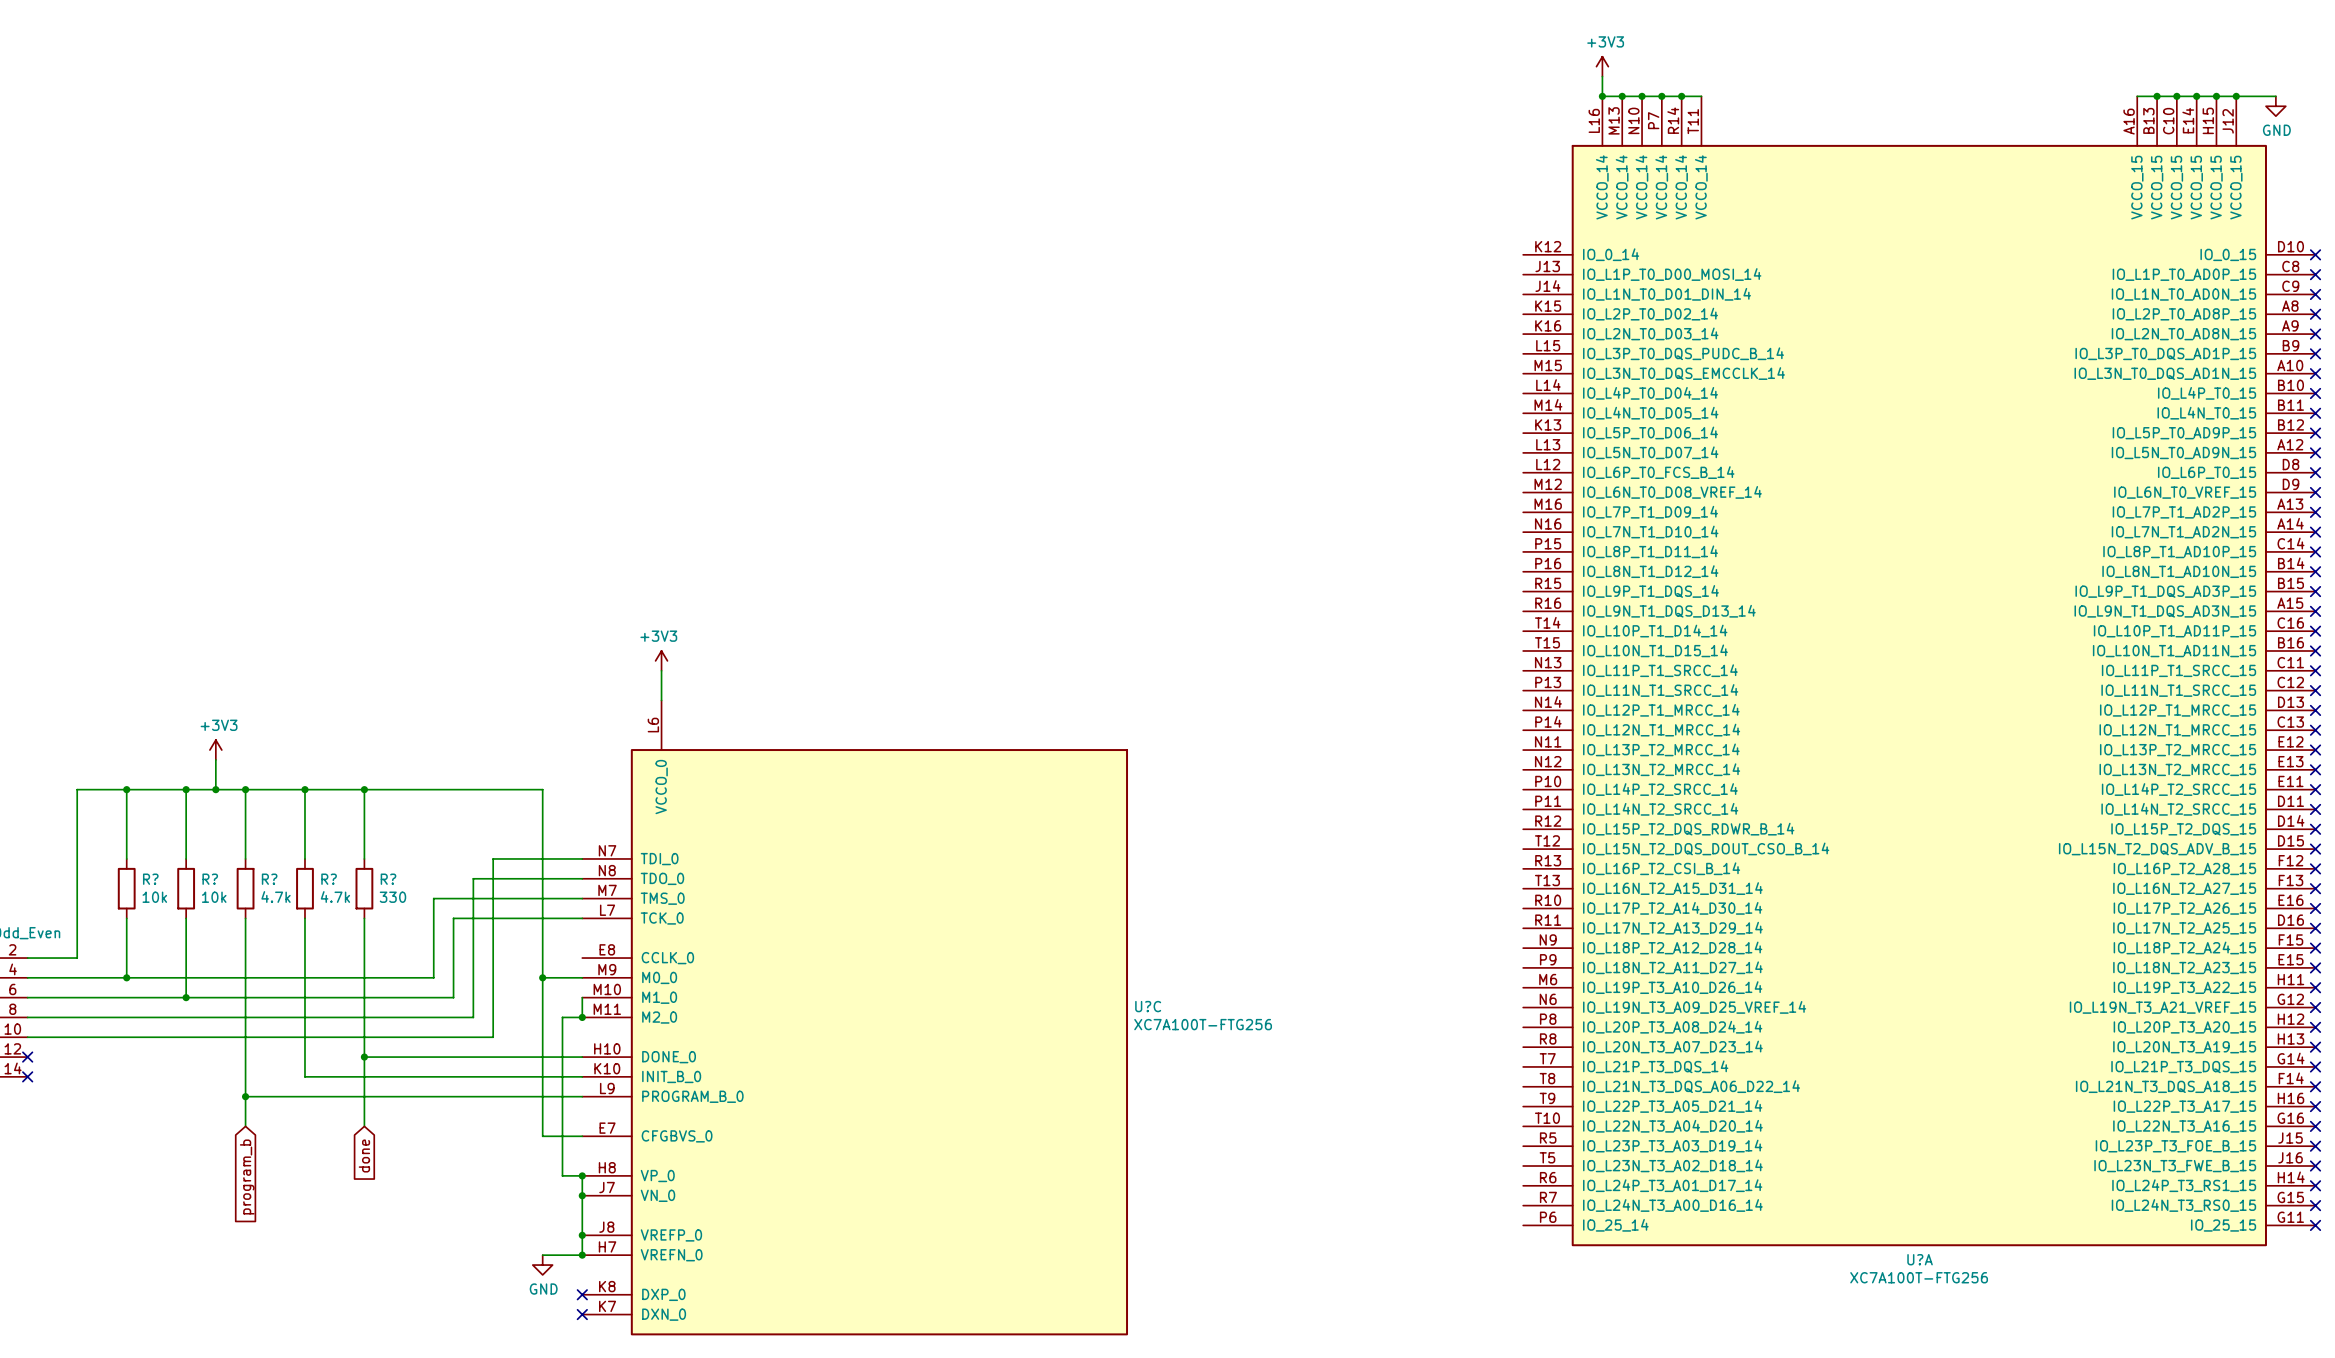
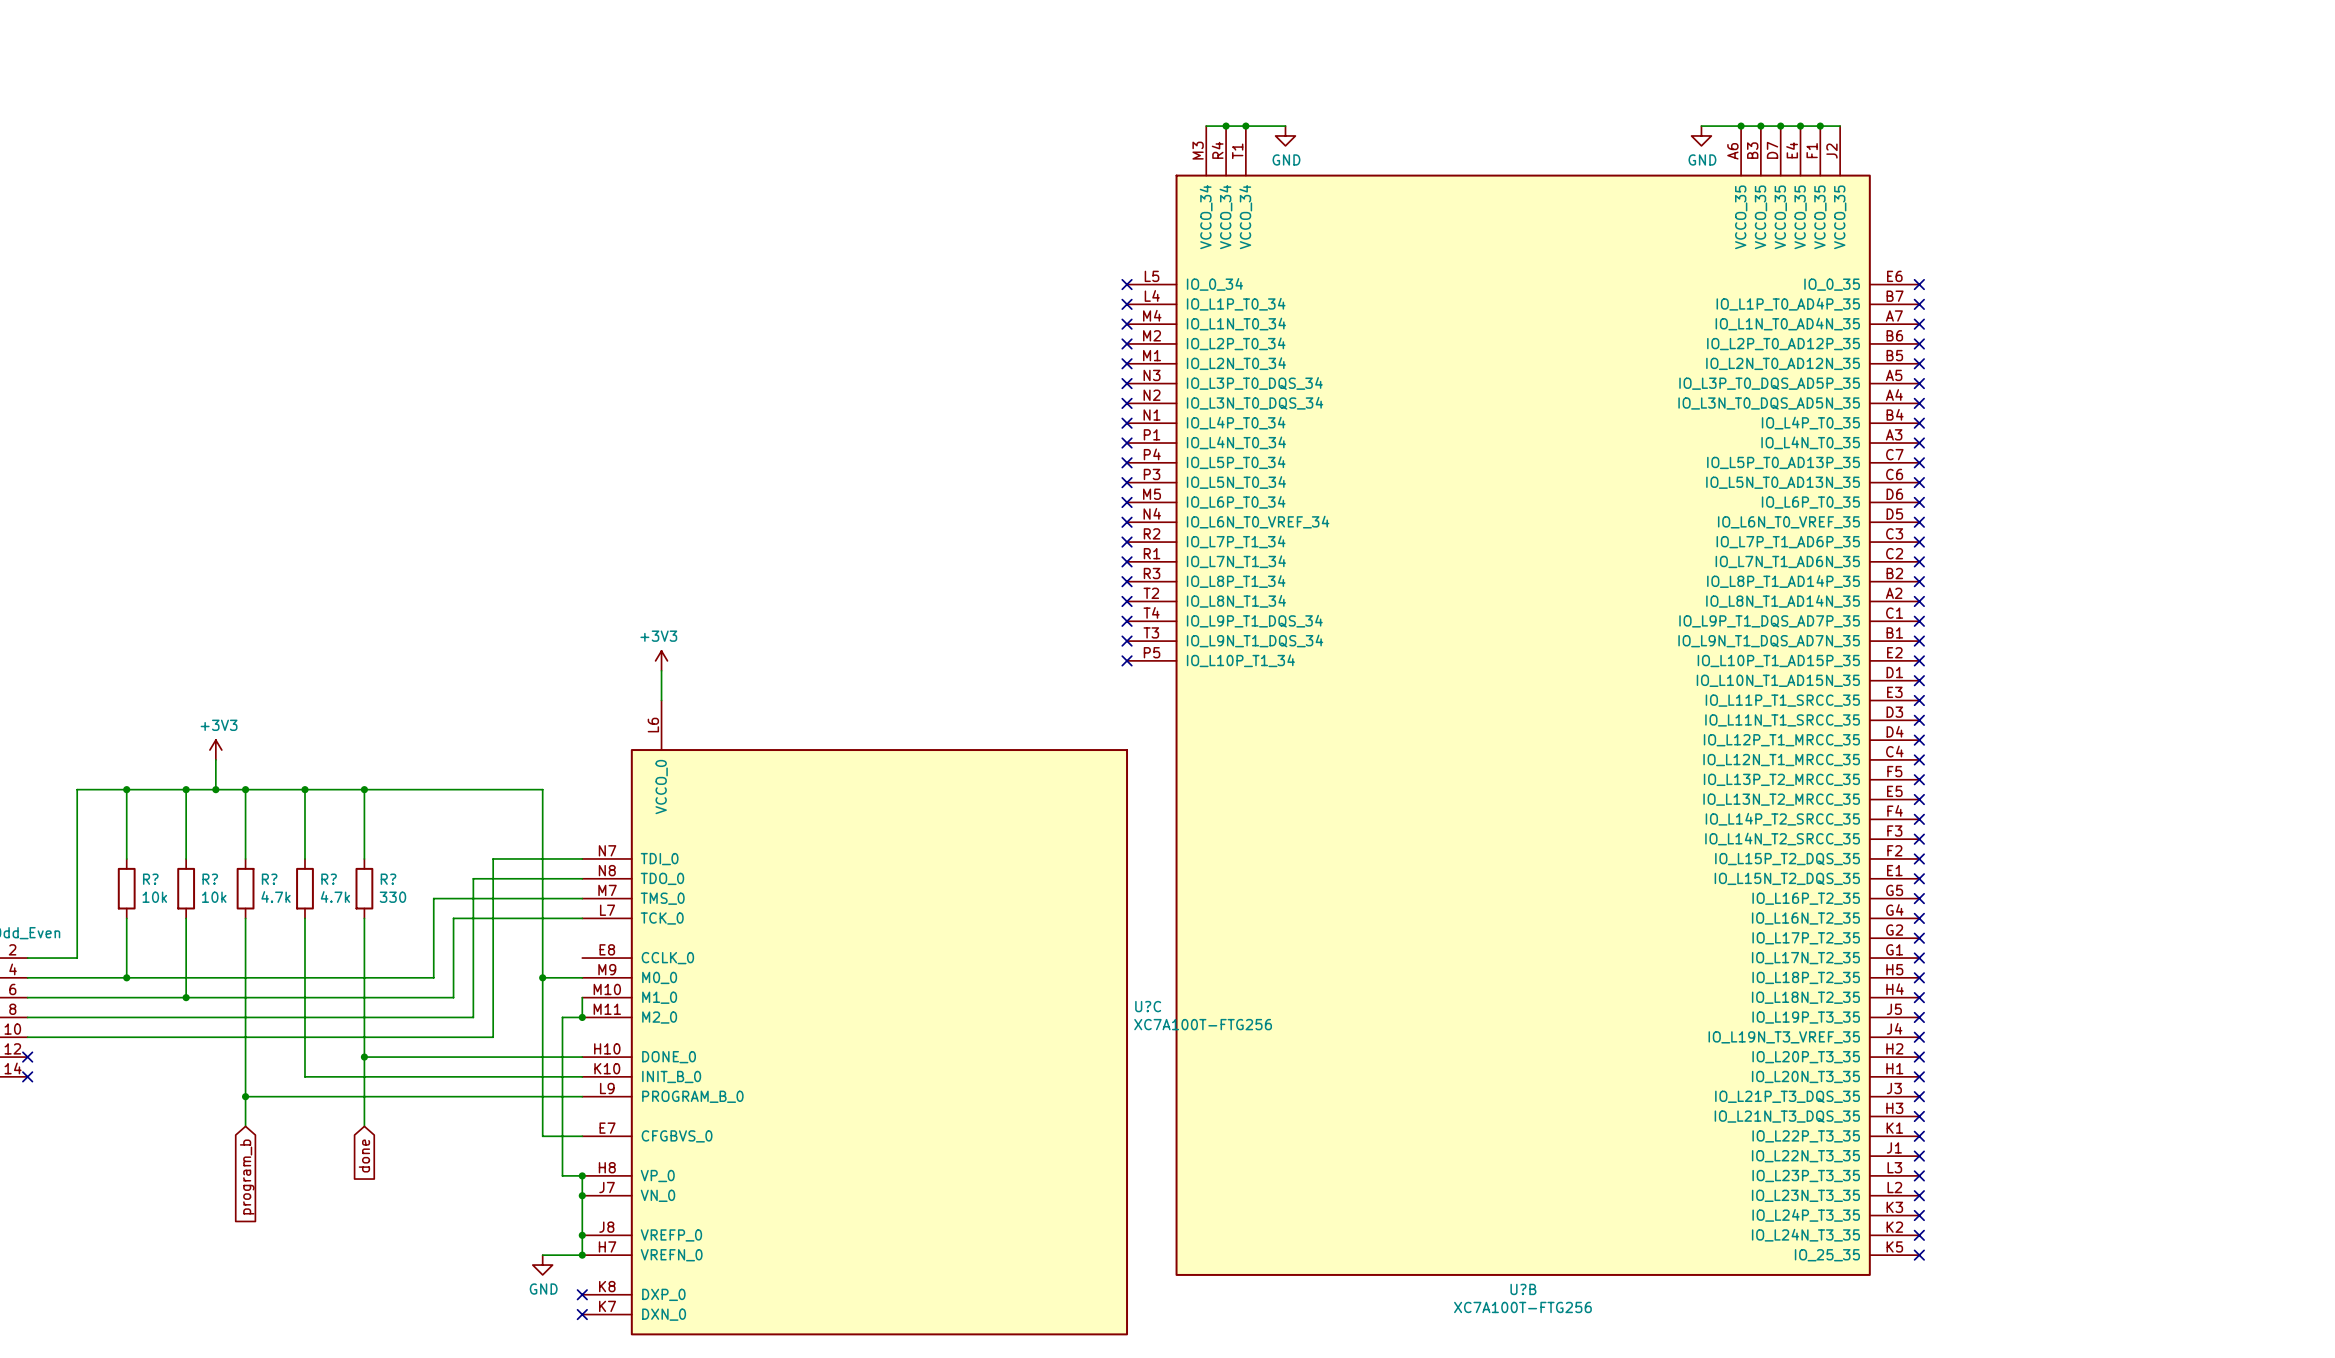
power symbol: +3V3 (1602, 66) -> none
wire: (1602, 76) (1602, 96) (1701, 96) -> none
junction: (1602, 96) -> none
junction: (1622, 96) -> none
junction: (1642, 96) -> none
junction: (1661, 96) -> none
junction: (1681, 96) -> none
wire: (2137, 96) (2275, 96) -> none
junction: (2157, 96) -> none
junction: (2176, 96) -> none
junction: (2196, 96) -> none
junction: (2216, 96) -> none
junction: (2236, 96) -> none
power symbol: GND (2275, 106) -> none
wire: none -> (1206, 126) (1285, 126)
junction: none -> (1226, 126)
junction: none -> (1245, 126)
wire: none -> (1701, 126) (1840, 126)
junction: none -> (1741, 126)
junction: none -> (1760, 126)
junction: none -> (1780, 126)
junction: none -> (1800, 126)
junction: none -> (1820, 126)
power symbol: none -> GND (1285, 135)
power symbol: none -> GND (1701, 135)
no-connect mark: (2315, 254) -> none
no-connect mark: (2315, 274) -> none
no-connect mark: none -> (1127, 284)
no-connect mark: none -> (1919, 284)
no-connect mark: (2315, 294) -> none
no-connect mark: none -> (1127, 304)
no-connect mark: none -> (1919, 304)
no-connect mark: (2315, 314) -> none
no-connect mark: none -> (1127, 324)
no-connect mark: none -> (1919, 324)
no-connect mark: (2315, 334) -> none
no-connect mark: none -> (1127, 343)
no-connect mark: none -> (1919, 343)
no-connect mark: (2315, 353) -> none
no-connect mark: none -> (1127, 363)
no-connect mark: none -> (1919, 363)
no-connect mark: (2315, 373) -> none
no-connect mark: none -> (1127, 383)
no-connect mark: none -> (1919, 383)
no-connect mark: (2315, 393) -> none
no-connect mark: none -> (1127, 403)
no-connect mark: none -> (1919, 403)
no-connect mark: (2315, 413) -> none
no-connect mark: none -> (1127, 423)
no-connect mark: none -> (1919, 423)
no-connect mark: (2315, 433) -> none
no-connect mark: none -> (1127, 443)
no-connect mark: none -> (1919, 443)
no-connect mark: (2315, 452) -> none
no-connect mark: none -> (1127, 462)
no-connect mark: none -> (1919, 462)
no-connect mark: (2315, 472) -> none
no-connect mark: none -> (1127, 482)
no-connect mark: none -> (1919, 482)
no-connect mark: (2315, 492) -> none
no-connect mark: none -> (1127, 502)
no-connect mark: none -> (1919, 502)
no-connect mark: (2315, 512) -> none
no-connect mark: none -> (1127, 522)
no-connect mark: none -> (1919, 522)
no-connect mark: (2315, 532) -> none
no-connect mark: none -> (1127, 542)
no-connect mark: none -> (1919, 542)
no-connect mark: (2315, 551) -> none
no-connect mark: none -> (1127, 561)
no-connect mark: none -> (1919, 561)
no-connect mark: (2315, 571) -> none
no-connect mark: none -> (1127, 581)
no-connect mark: none -> (1919, 581)
no-connect mark: (2315, 591) -> none
no-connect mark: none -> (1127, 601)
no-connect mark: none -> (1919, 601)
no-connect mark: (2315, 611) -> none
no-connect mark: none -> (1127, 621)
no-connect mark: none -> (1919, 621)
no-connect mark: (2315, 631) -> none
no-connect mark: none -> (1127, 641)
no-connect mark: none -> (1919, 641)
no-connect mark: (2315, 650) -> none
no-connect mark: none -> (1127, 660)
no-connect mark: none -> (1919, 660)
no-connect mark: (2315, 670) -> none
U?A: XC7A100T-FTG256 (1919, 671) -> none
no-connect mark: none -> (1919, 680)
no-connect mark: (2315, 690) -> none
no-connect mark: none -> (1919, 700)
U?B: none -> XC7A100T-FTG256 (1523, 701)
no-connect mark: (2315, 710) -> none
no-connect mark: none -> (1919, 720)
no-connect mark: (2315, 730) -> none
no-connect mark: none -> (1919, 740)
no-connect mark: (2315, 750) -> none
no-connect mark: none -> (1919, 759)
no-connect mark: (2315, 769) -> none
no-connect mark: none -> (1919, 779)
no-connect mark: (2315, 789) -> none
no-connect mark: none -> (1919, 799)
no-connect mark: (2315, 809) -> none
no-connect mark: none -> (1919, 819)
no-connect mark: (2315, 829) -> none
no-connect mark: none -> (1919, 839)
no-connect mark: (2315, 849) -> none
no-connect mark: none -> (1919, 858)
no-connect mark: (2315, 868) -> none
no-connect mark: none -> (1919, 878)
no-connect mark: (2315, 888) -> none
no-connect mark: none -> (1919, 898)
no-connect mark: (2315, 908) -> none
no-connect mark: none -> (1919, 918)
no-connect mark: (2315, 928) -> none
no-connect mark: none -> (1919, 938)
no-connect mark: (2315, 948) -> none
no-connect mark: none -> (1919, 958)
no-connect mark: (2315, 967) -> none
no-connect mark: none -> (1919, 977)
no-connect mark: (2315, 987) -> none
no-connect mark: none -> (1919, 997)
no-connect mark: (2315, 1007) -> none
no-connect mark: none -> (1919, 1017)
no-connect mark: (2315, 1027) -> none
no-connect mark: none -> (1919, 1037)
no-connect mark: (2315, 1047) -> none
no-connect mark: none -> (1919, 1057)
no-connect mark: (2315, 1066) -> none
no-connect mark: none -> (1919, 1076)
no-connect mark: (2315, 1086) -> none
no-connect mark: none -> (1919, 1096)
no-connect mark: (2315, 1106) -> none
no-connect mark: none -> (1919, 1116)
no-connect mark: (2315, 1126) -> none
no-connect mark: none -> (1919, 1136)
no-connect mark: (2315, 1146) -> none
no-connect mark: none -> (1919, 1156)
no-connect mark: (2315, 1166) -> none
no-connect mark: none -> (1919, 1175)
no-connect mark: (2315, 1185) -> none
no-connect mark: none -> (1919, 1195)
no-connect mark: (2315, 1205) -> none
no-connect mark: none -> (1919, 1215)
no-connect mark: (2315, 1225) -> none
no-connect mark: none -> (1919, 1235)
no-connect mark: none -> (1919, 1255)

